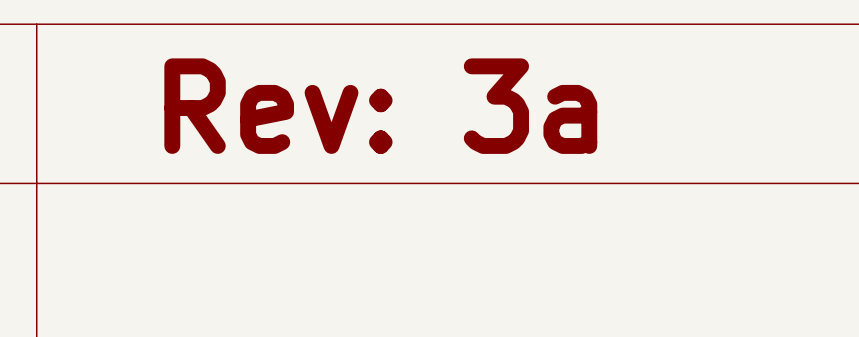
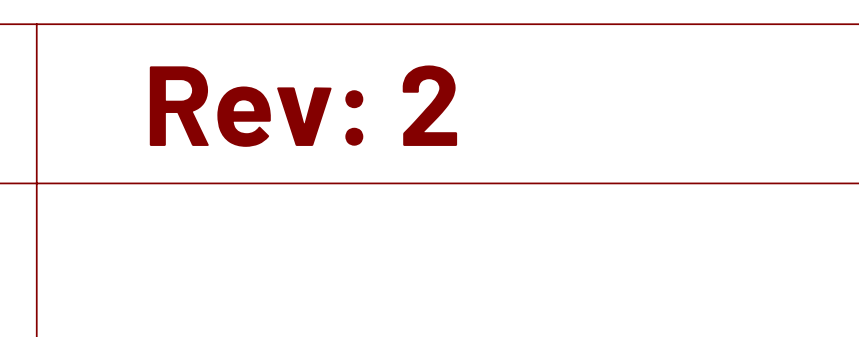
title block: Rev: 3a (380, 106) -> Rev: 2 (303, 106)

